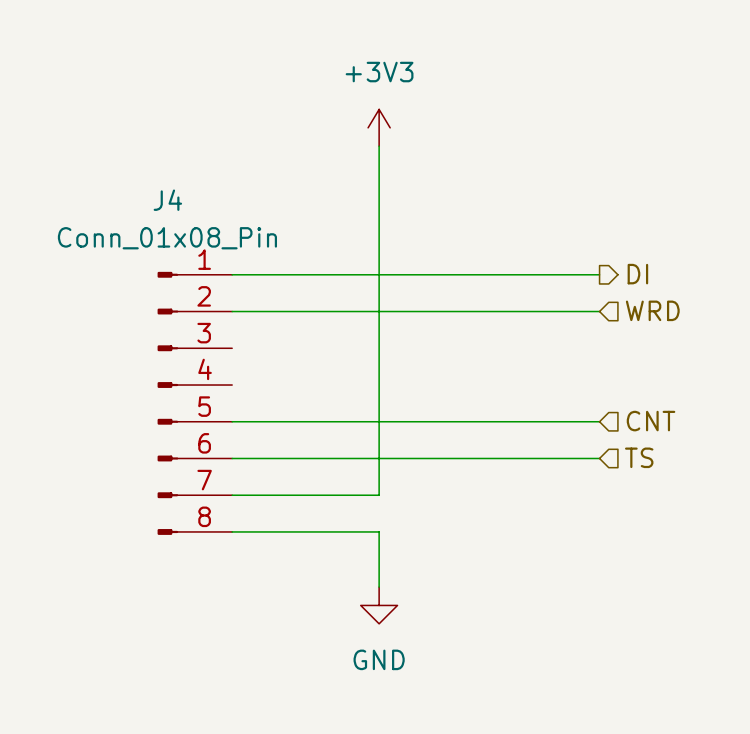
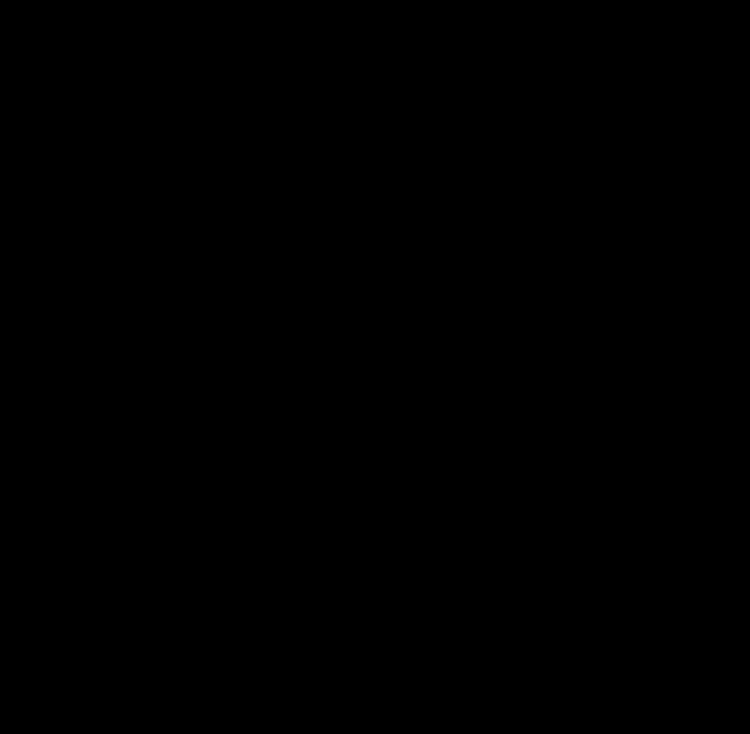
power symbol: +3V3 (379, 127) -> none
wire: (379, 146) (379, 495) (232, 495) -> none
wire: (232, 274) (599, 274) -> none
hierarchical label: DI (637, 274) -> none
hierarchical label: WRD (652, 310) -> none
wire: (232, 311) (599, 311) -> none
J4: Conn_01x08_Pin (194, 403) -> none
wire: (232, 421) (599, 421) -> none
hierarchical label: CNT (651, 421) -> none
hierarchical label: TS (639, 457) -> none
wire: (232, 458) (599, 458) -> none
wire: (232, 531) (379, 531) (379, 587) -> none
power symbol: GND (379, 605) -> none

